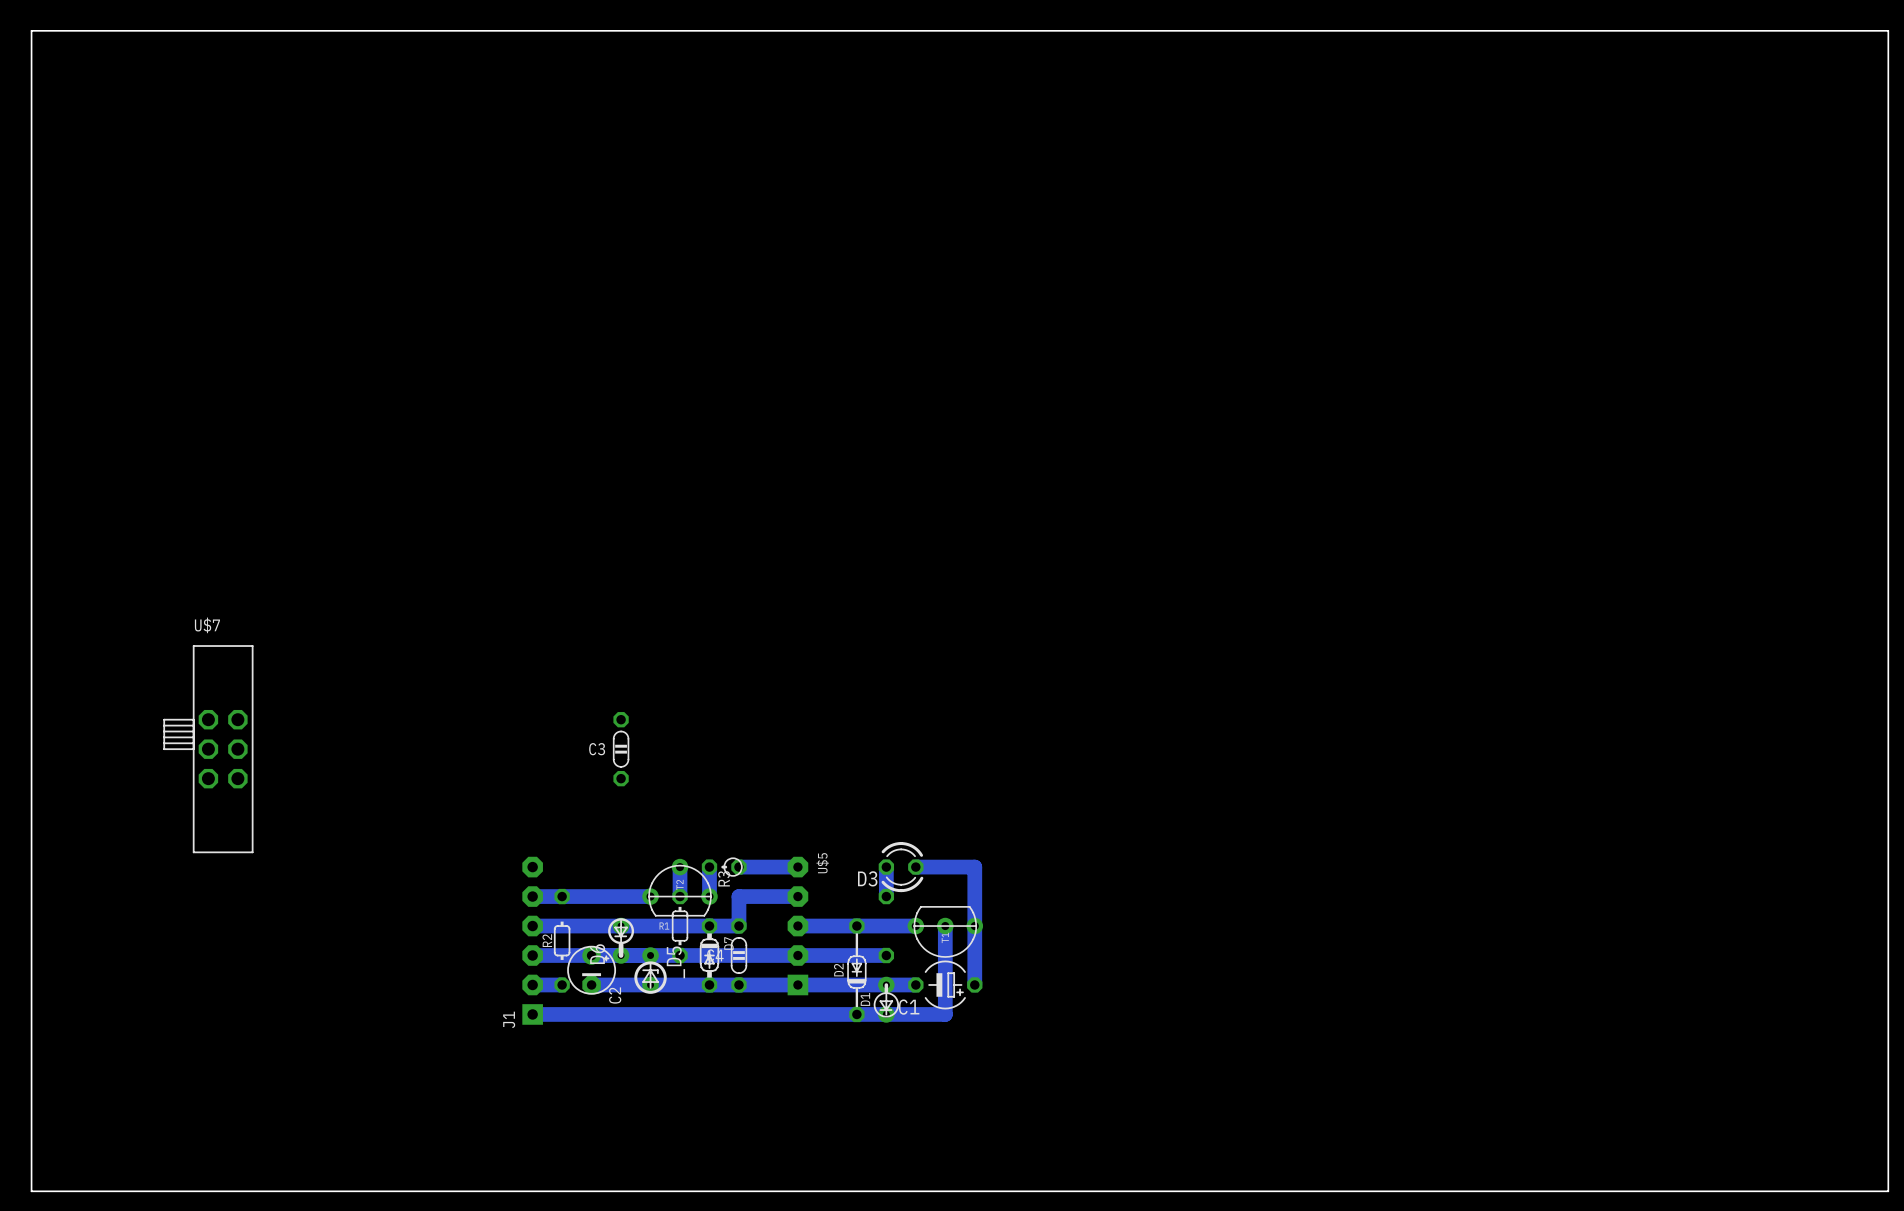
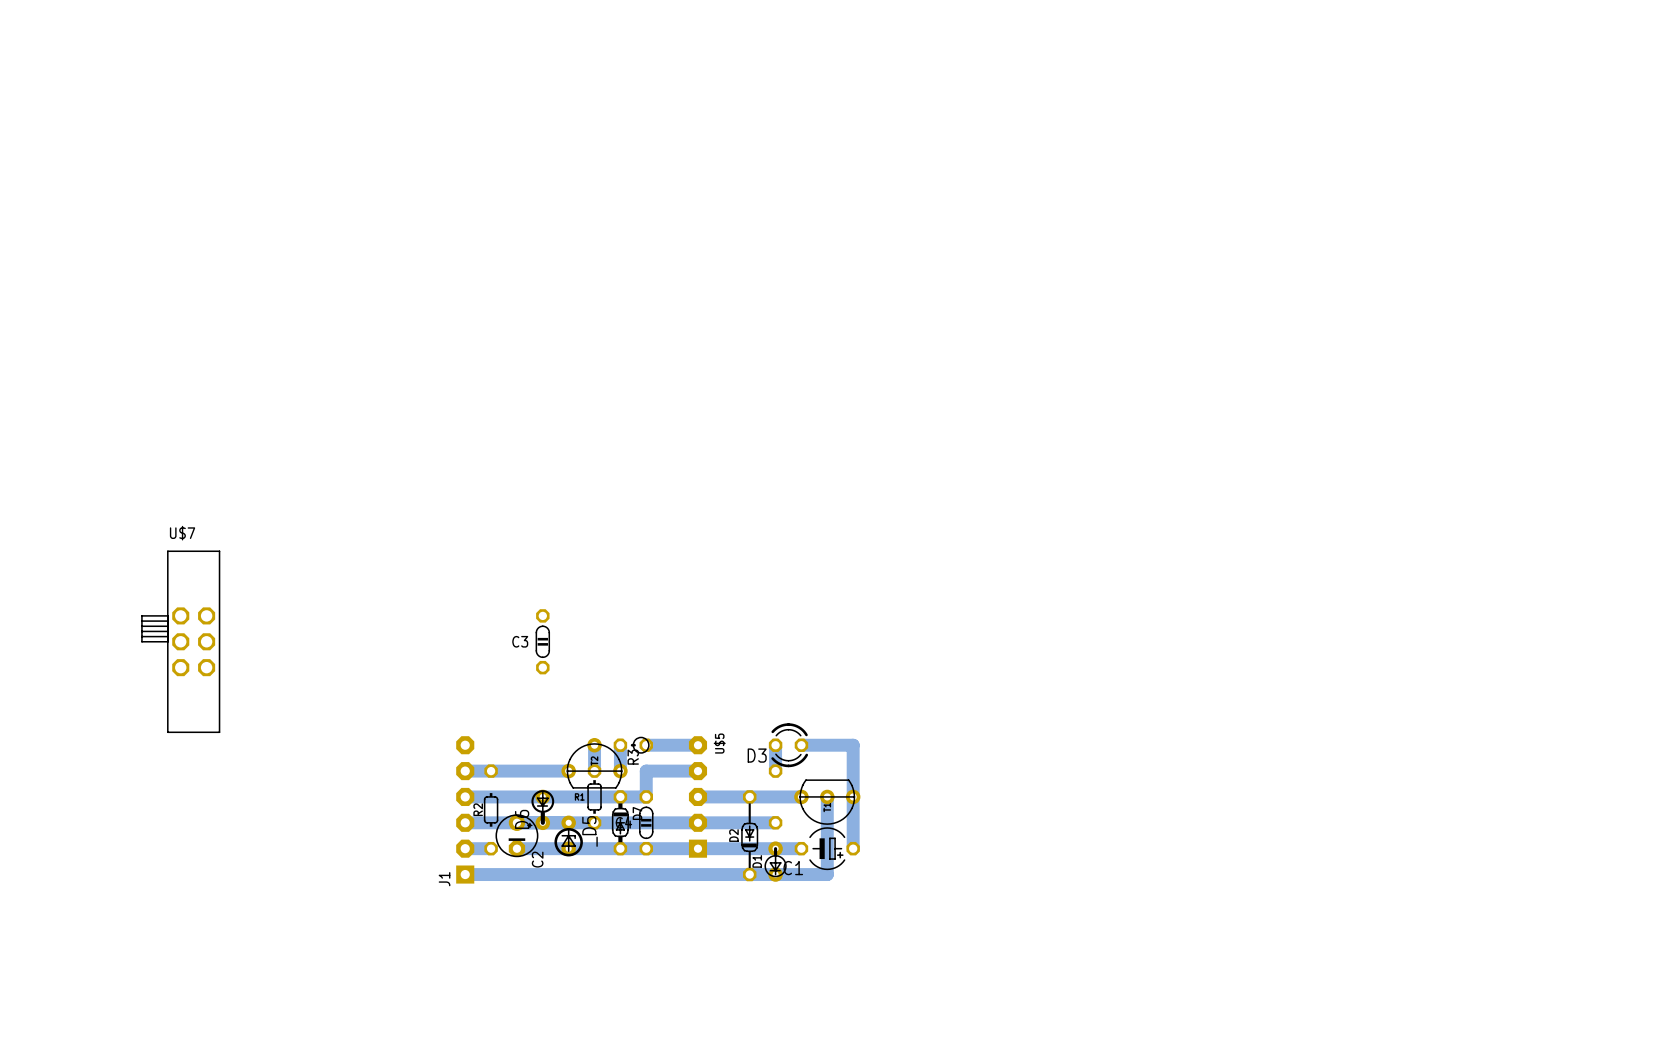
board edge: (31, 30) (1888, 30) (1888, 1191) (31, 1191) (31, 30) -> none

